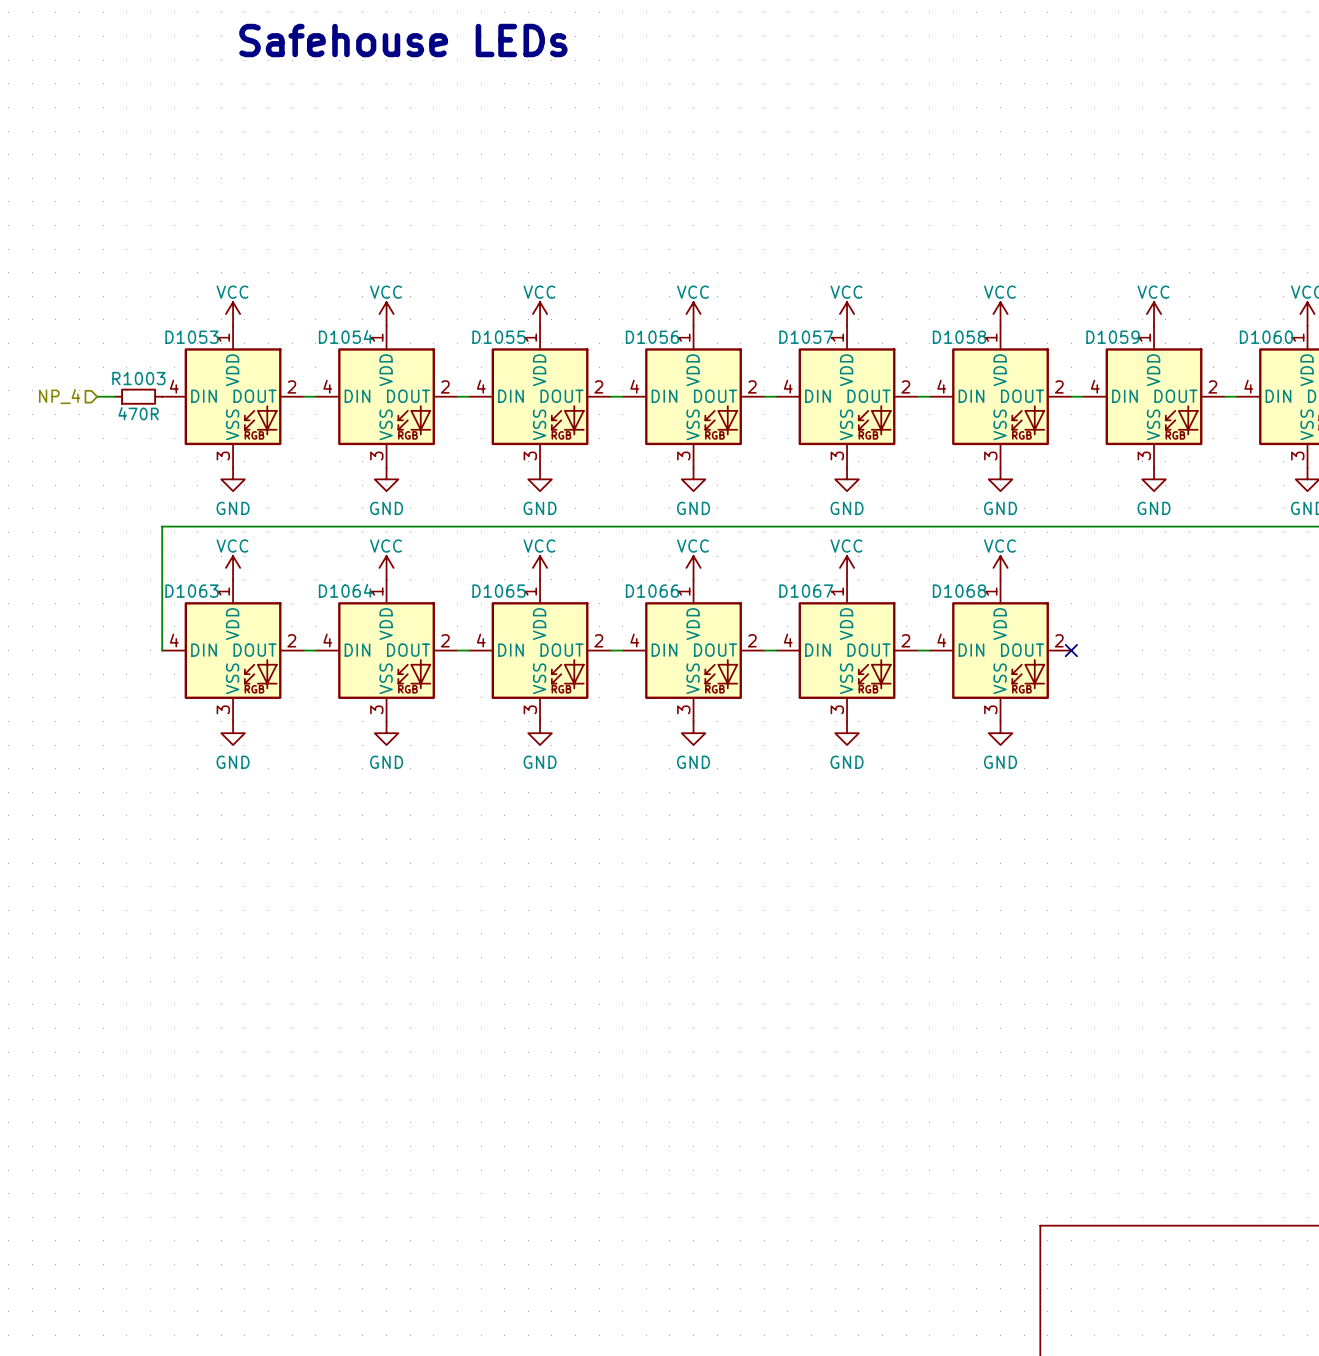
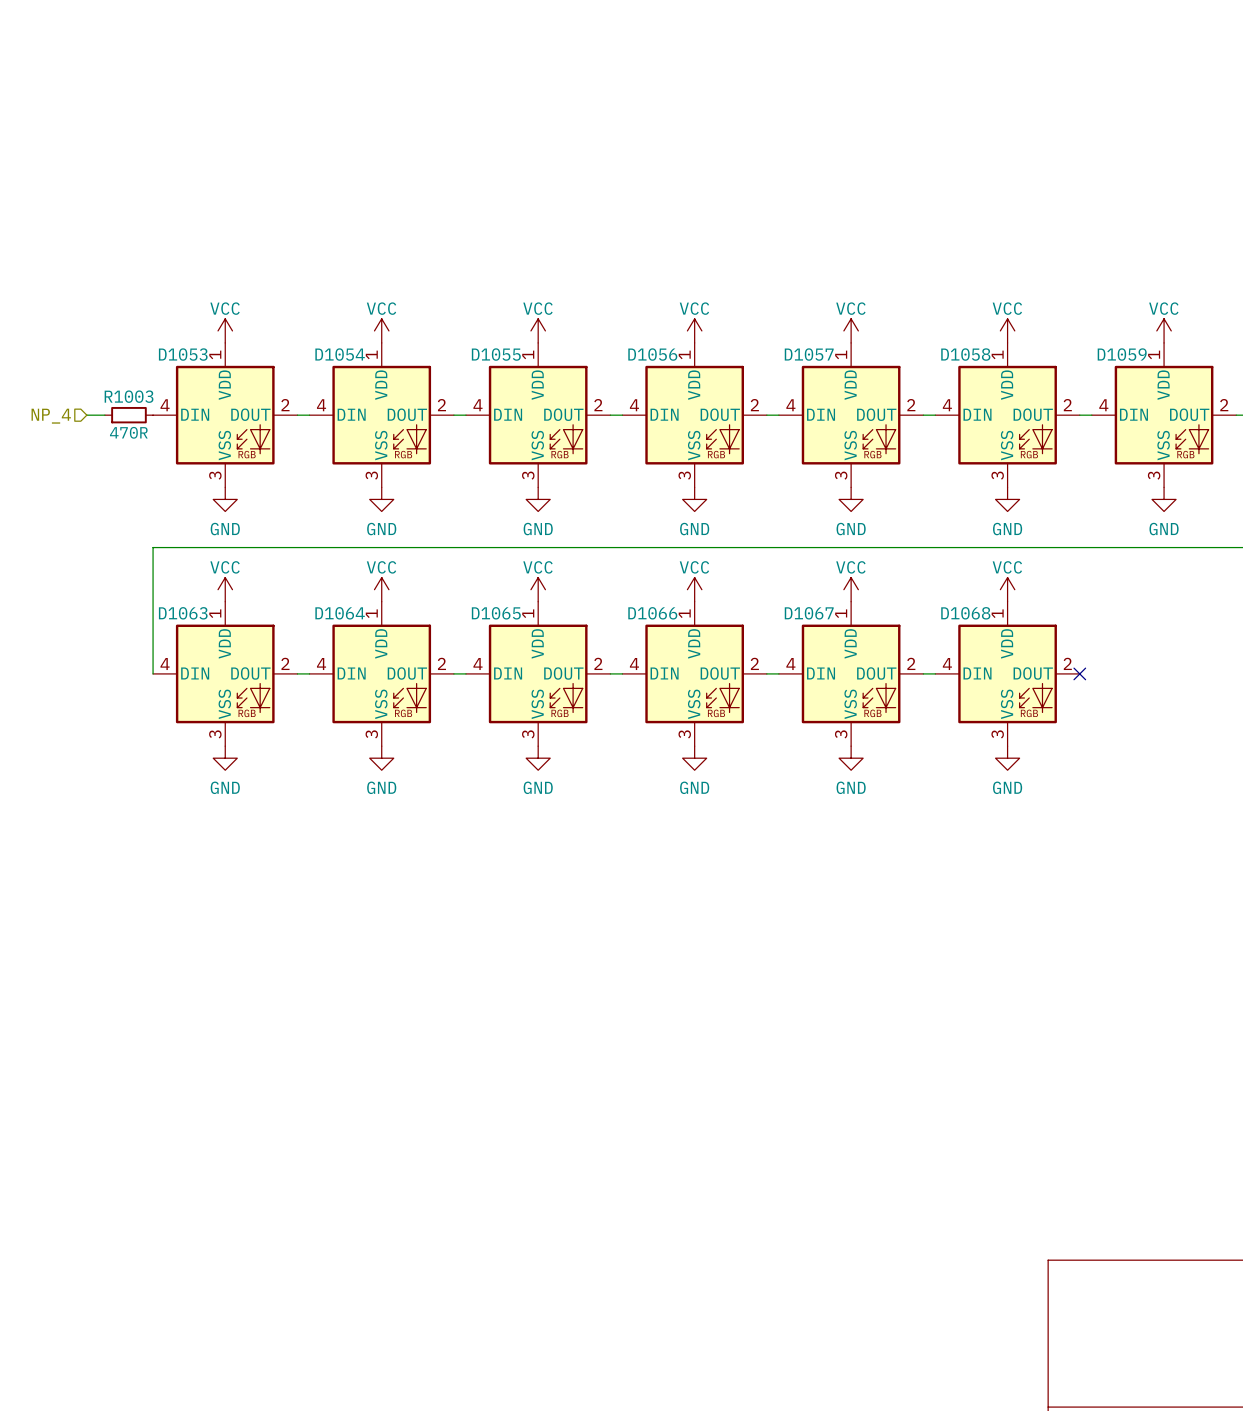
text: Safehouse LEDs (403, 40) -> none

